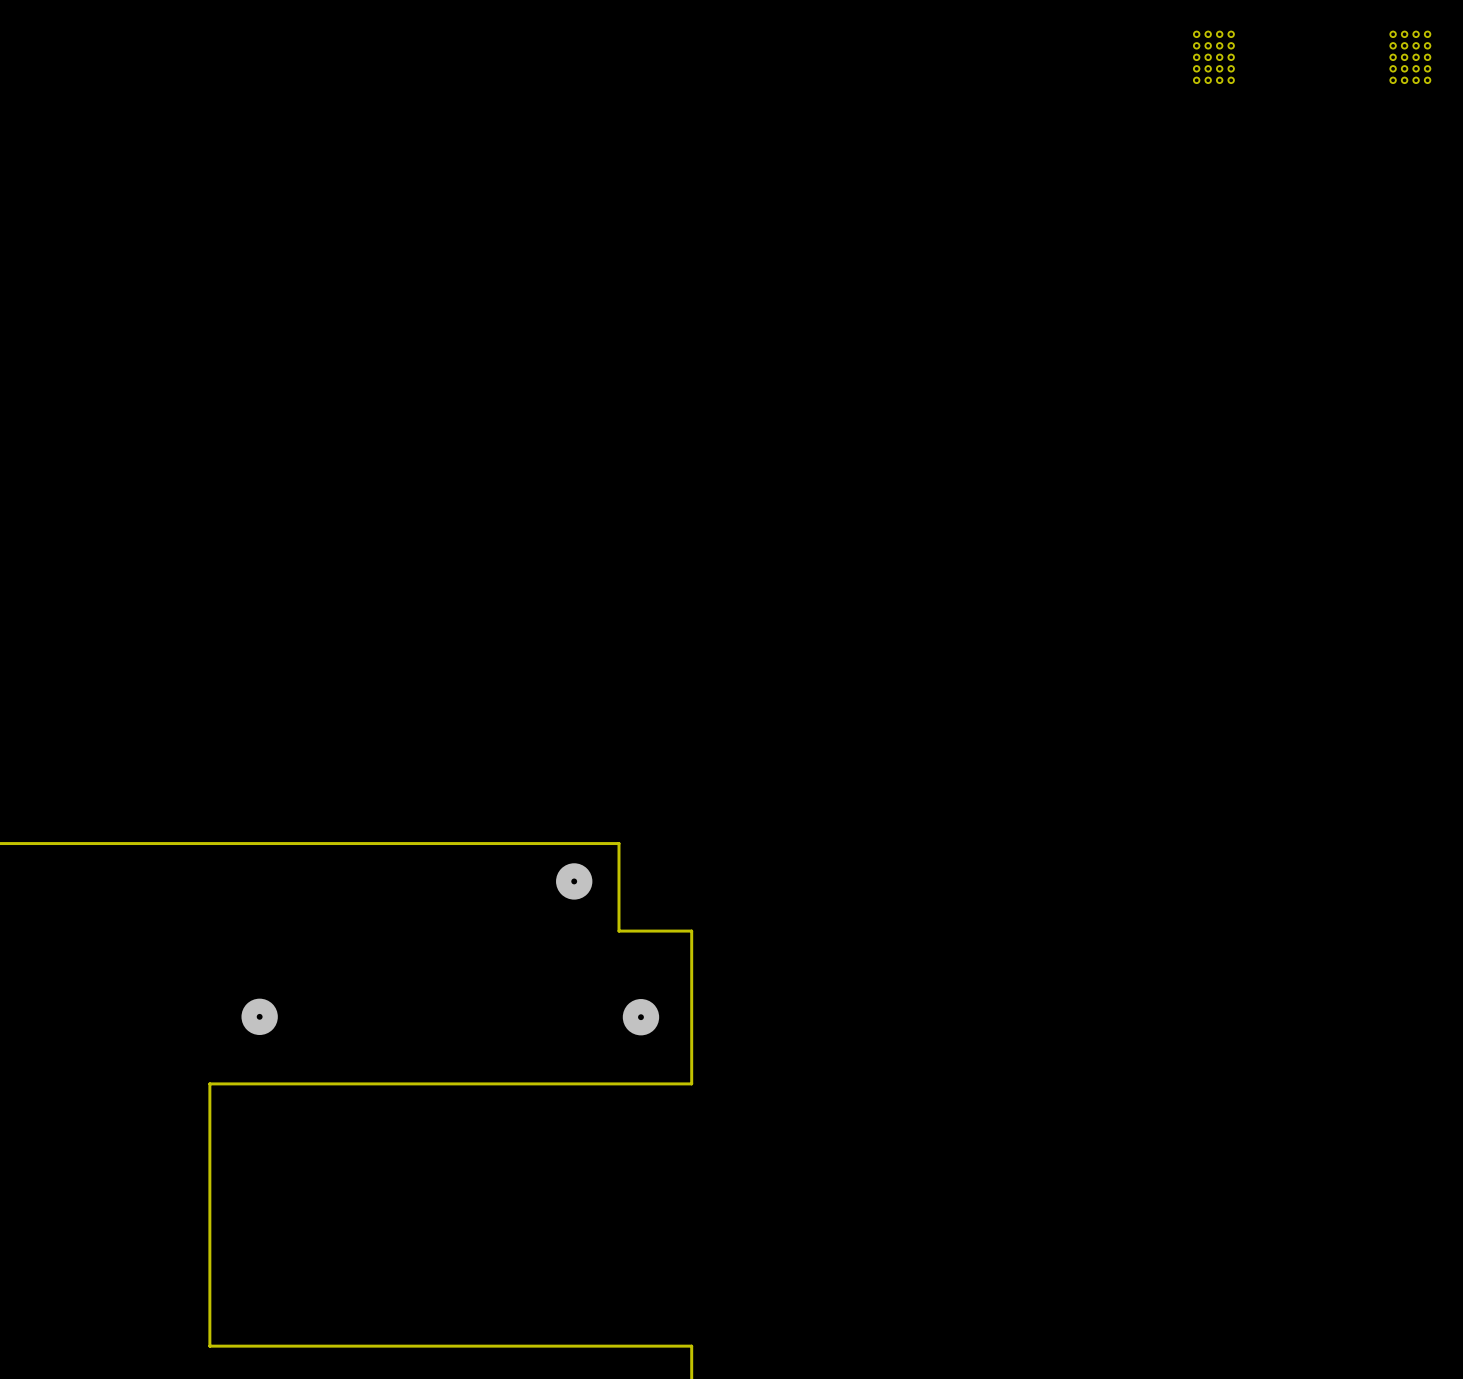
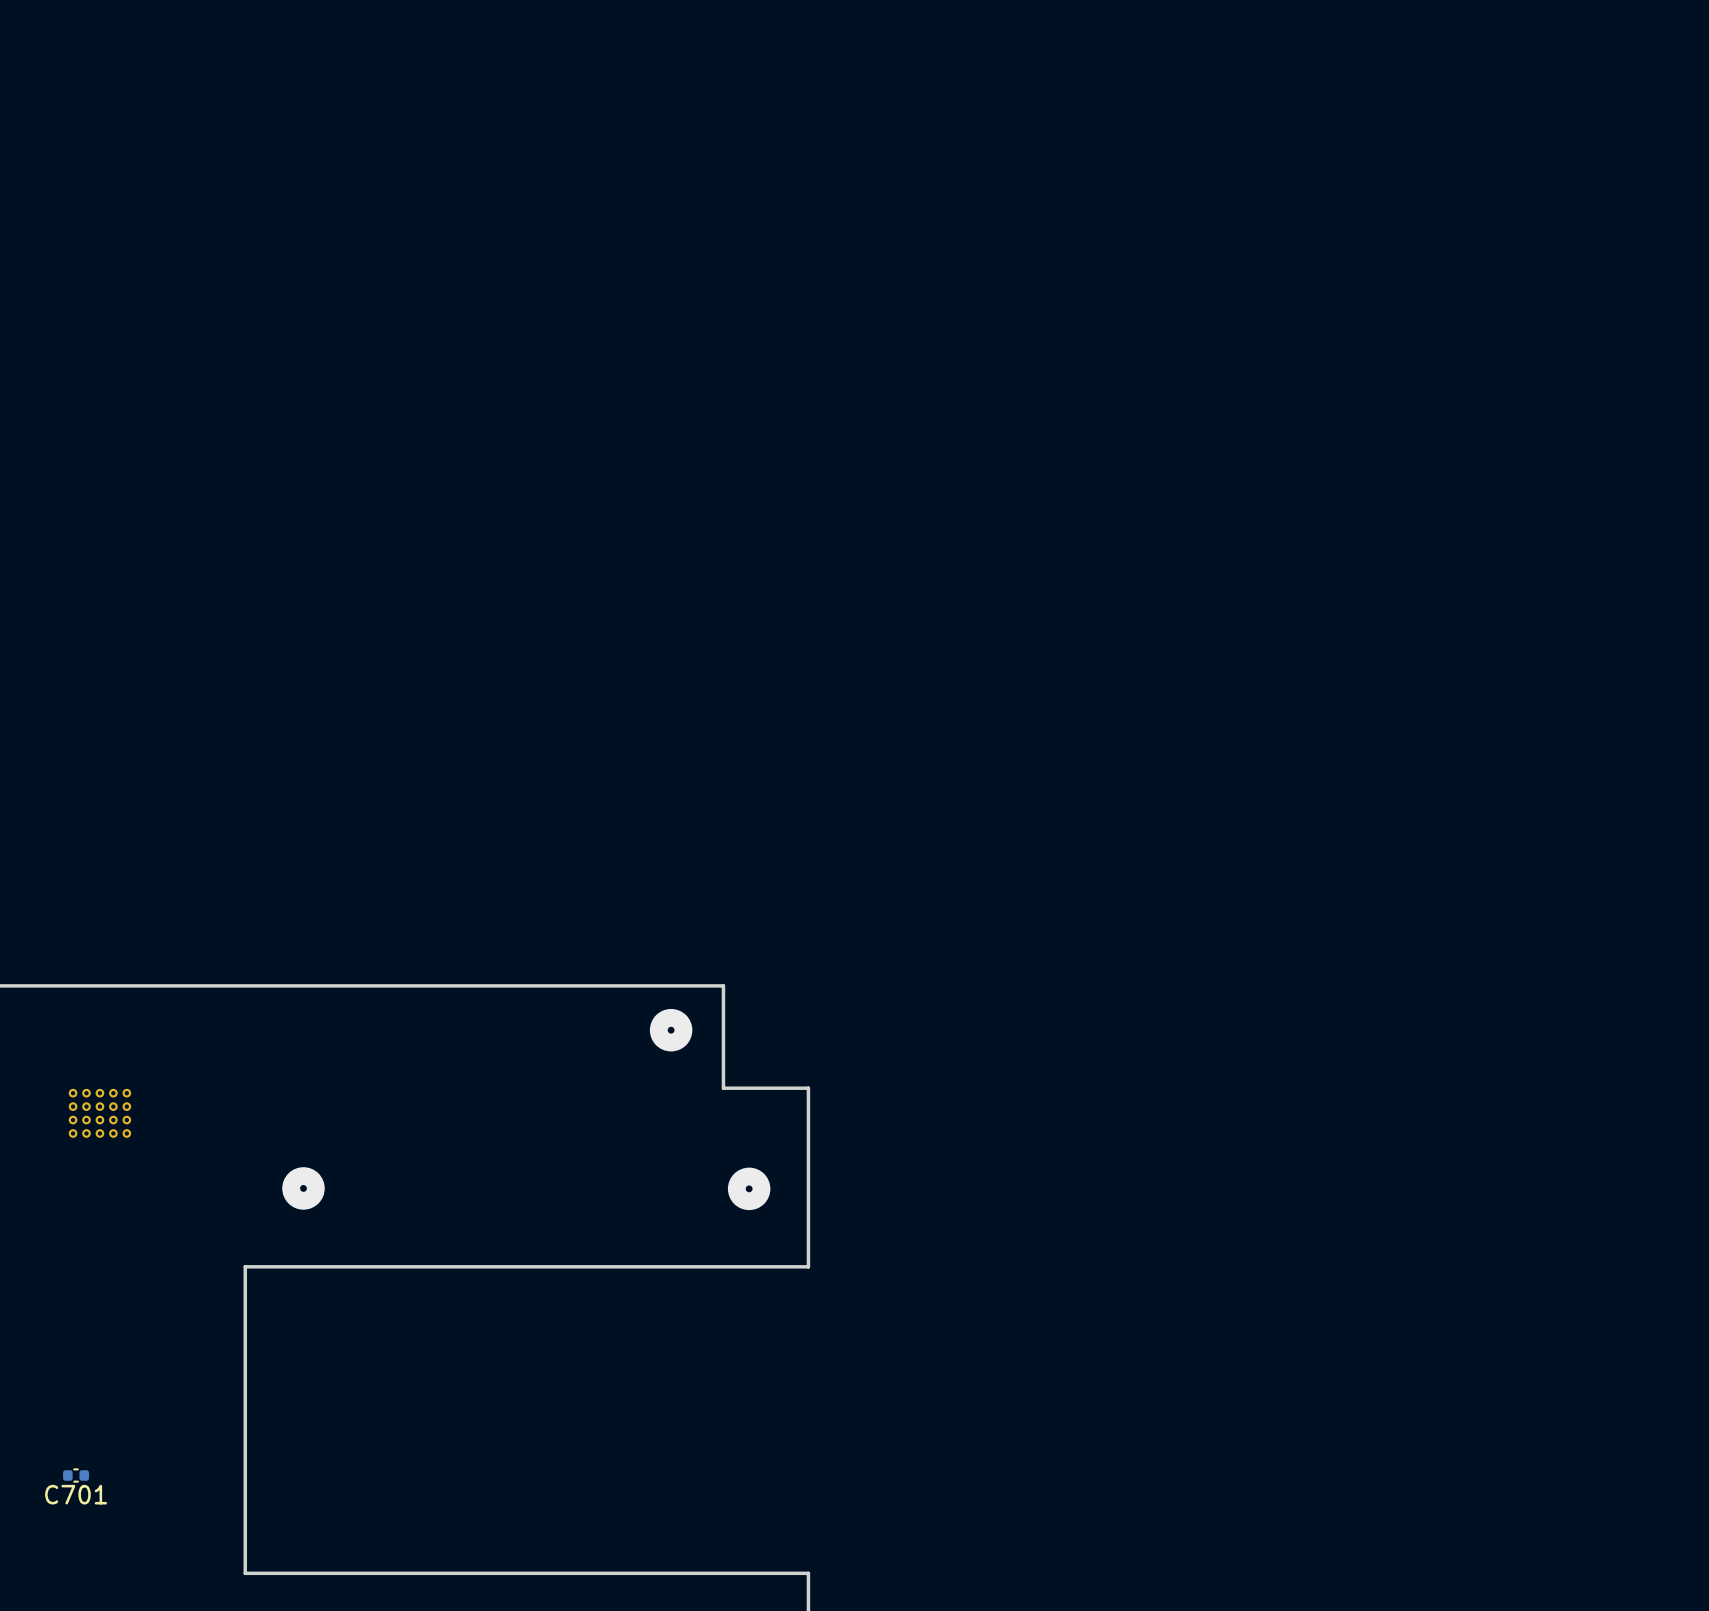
part: (1213, 57) -> none
part: (1410, 57) -> none
part: none -> (99, 1113)
C701: none -> (76, 1475)

